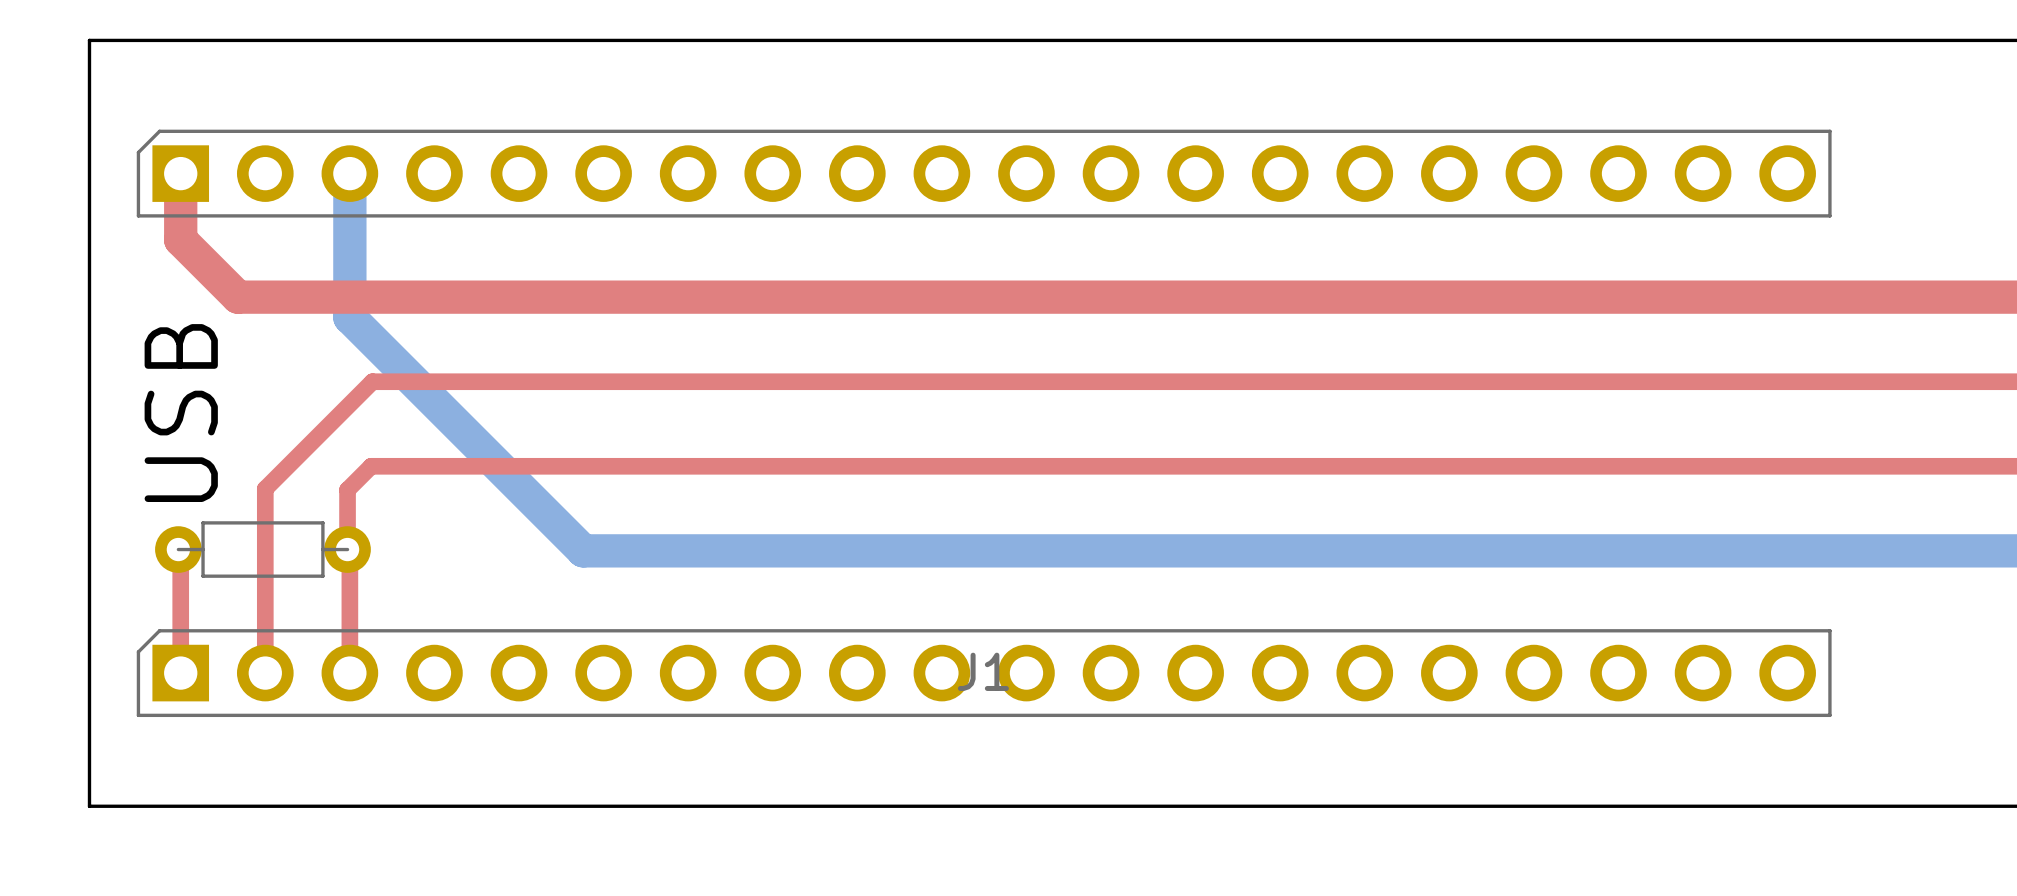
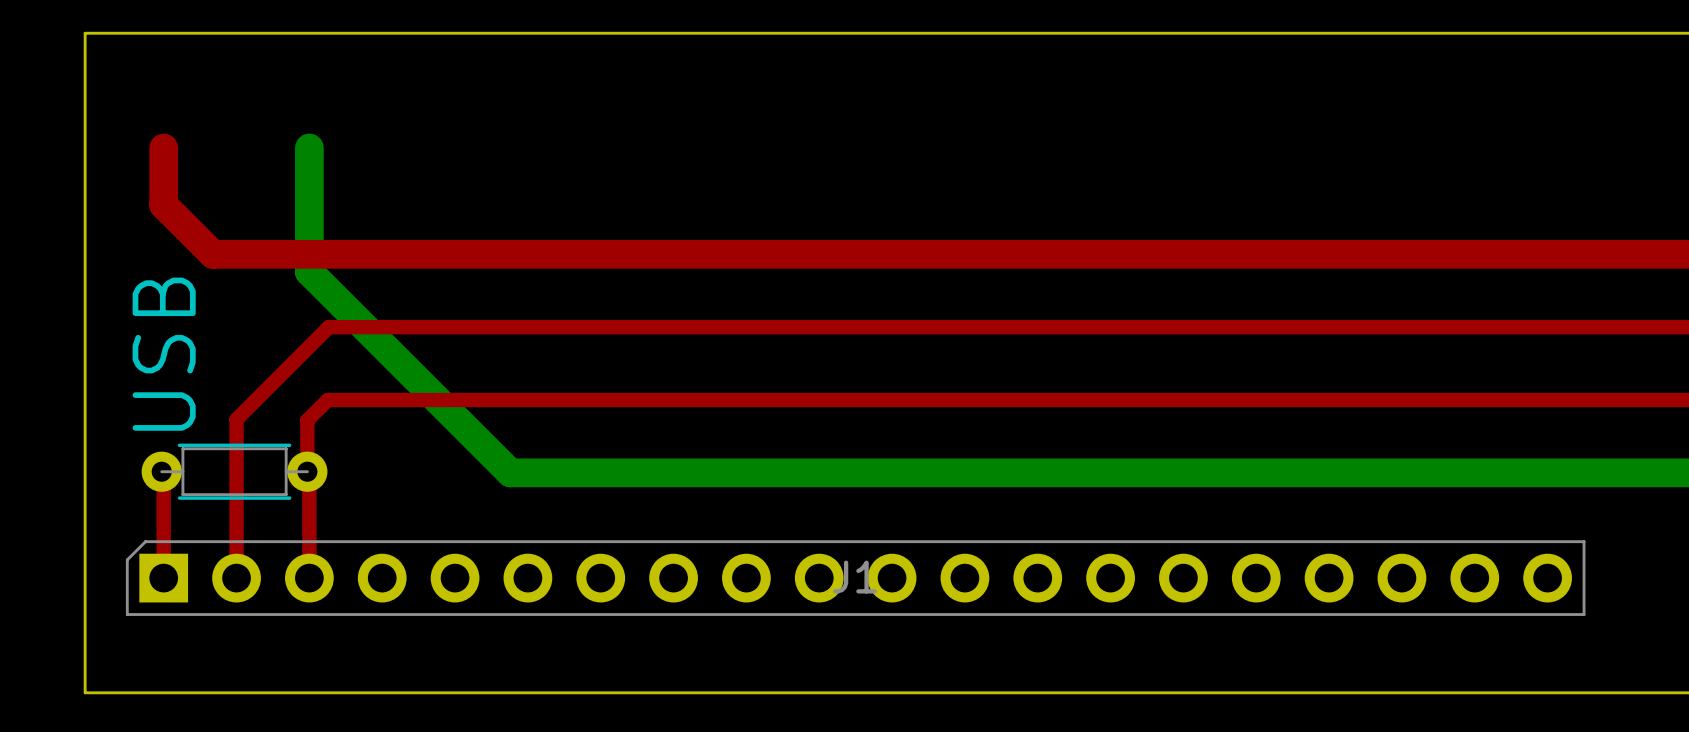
part: (984, 173) -> none
part footprint: [155, 521, 371, 578] -> [141, 443, 328, 500]

